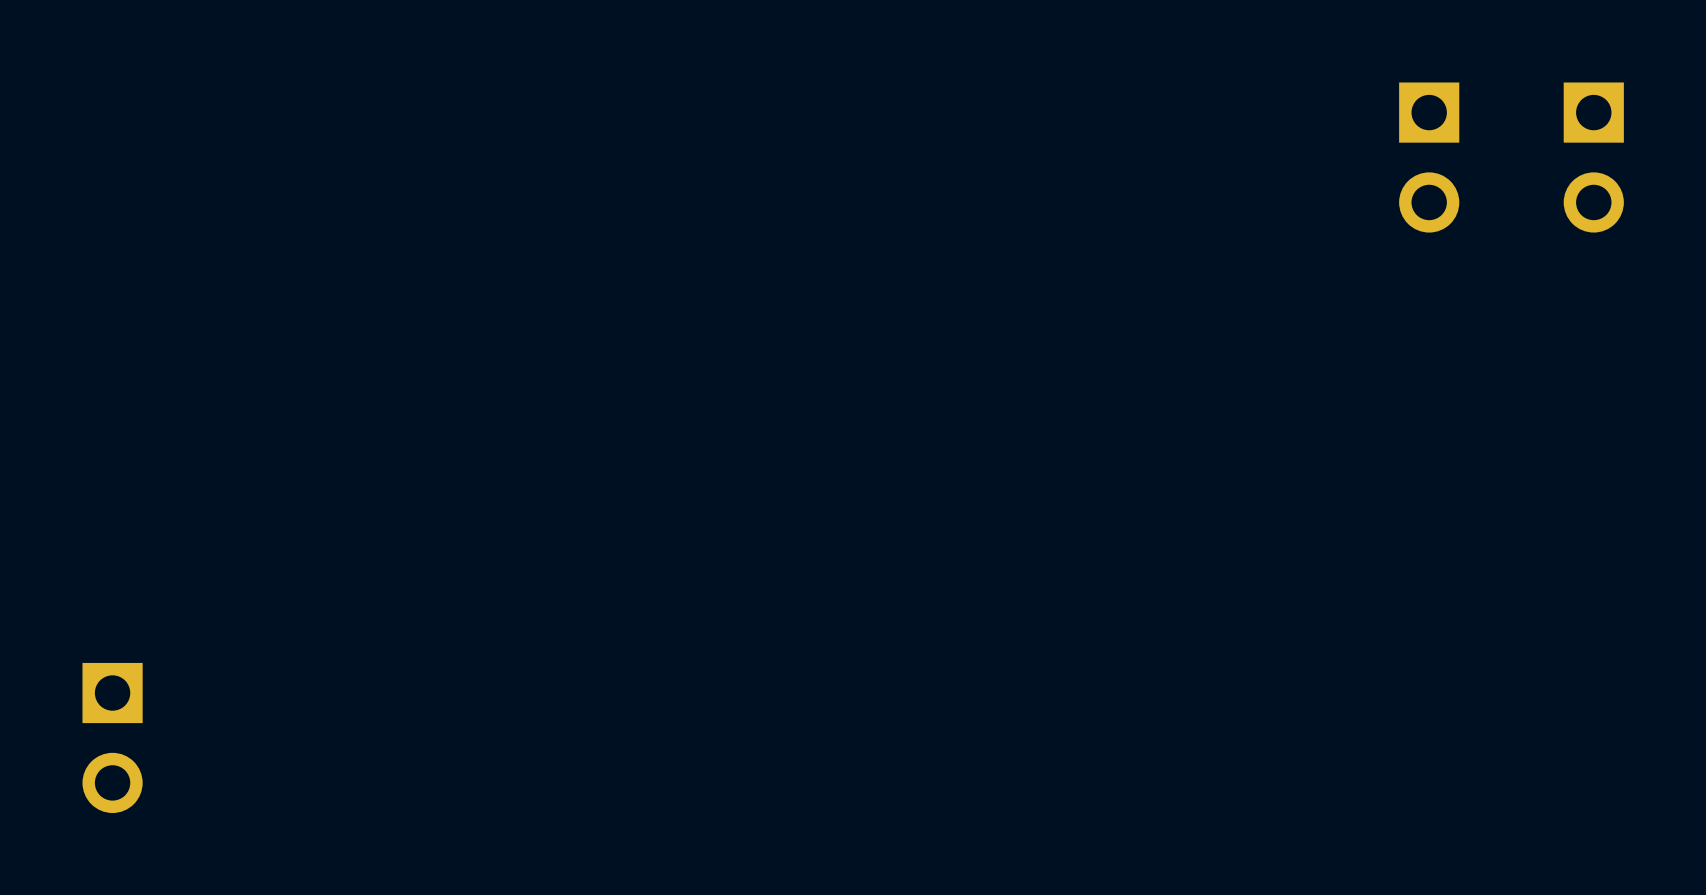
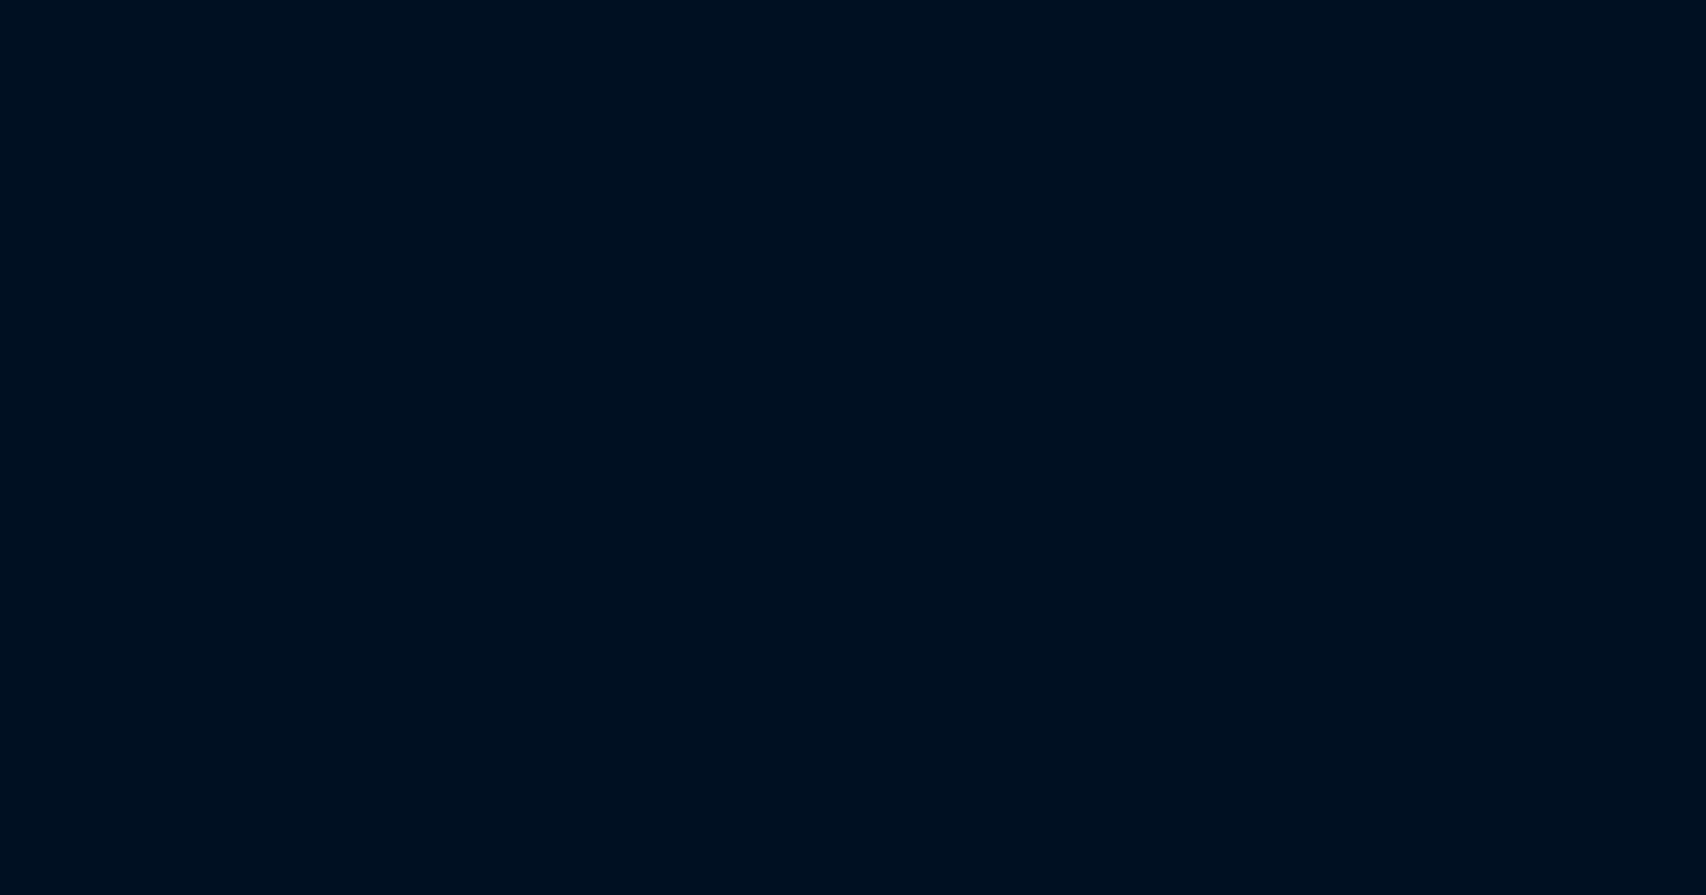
part: (1429, 157) -> none
part: (1593, 157) -> none
part: (112, 737) -> none

